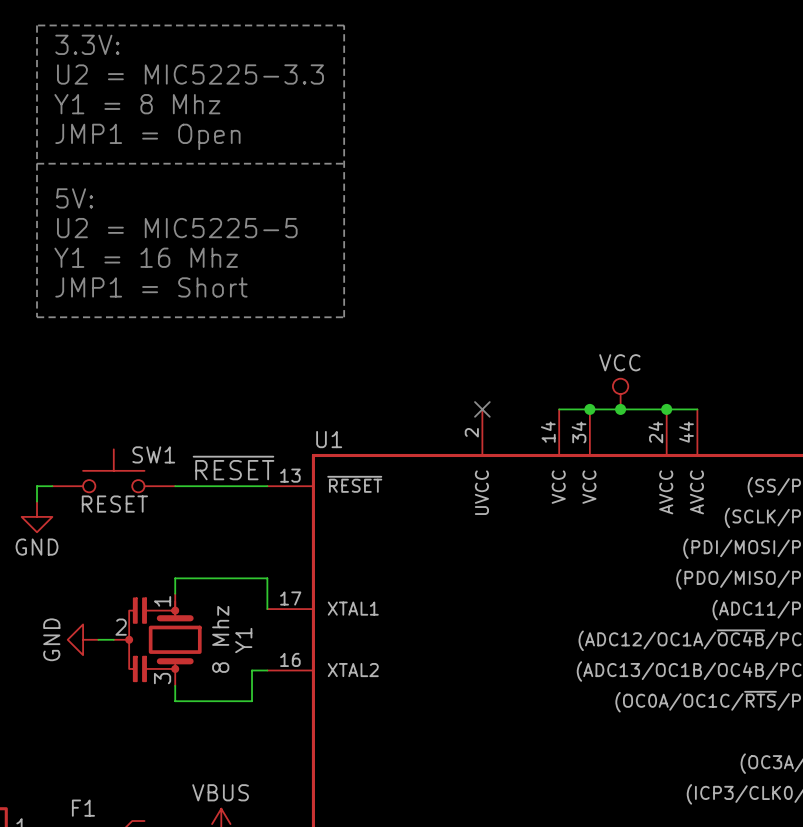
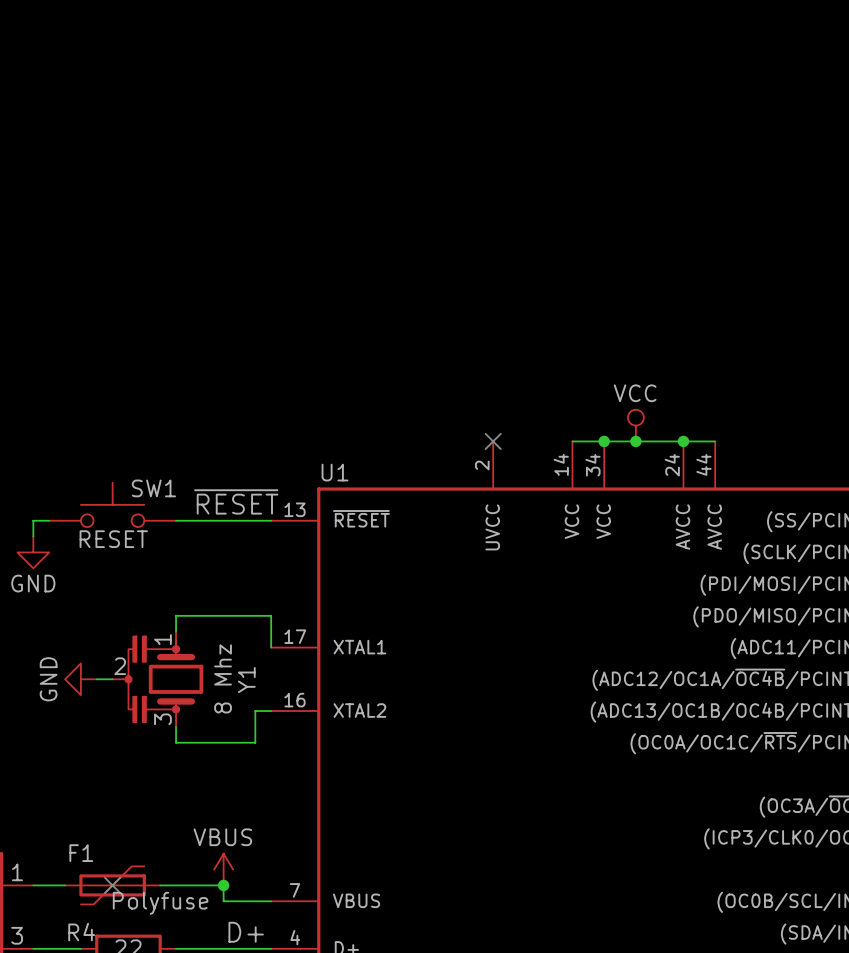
line: (37, 25) (37, 317) (344, 317) (344, 25) (37, 25) -> none
text: 3.3V: (87, 44) -> none
text: U2 = MIC5225-3.3 (190, 74) -> none
text: Y1 = 8 Mhz (137, 104) -> none
text: JMP1 = Open (147, 136) -> none
line: (37, 163) (344, 163) -> none
text: 5V: (74, 198) -> none
text: U2 = MIC5225-5 (177, 228) -> none
text: Y1 = 16 Mhz (146, 257) -> none
text: JMP1 = Short (151, 287) -> none

